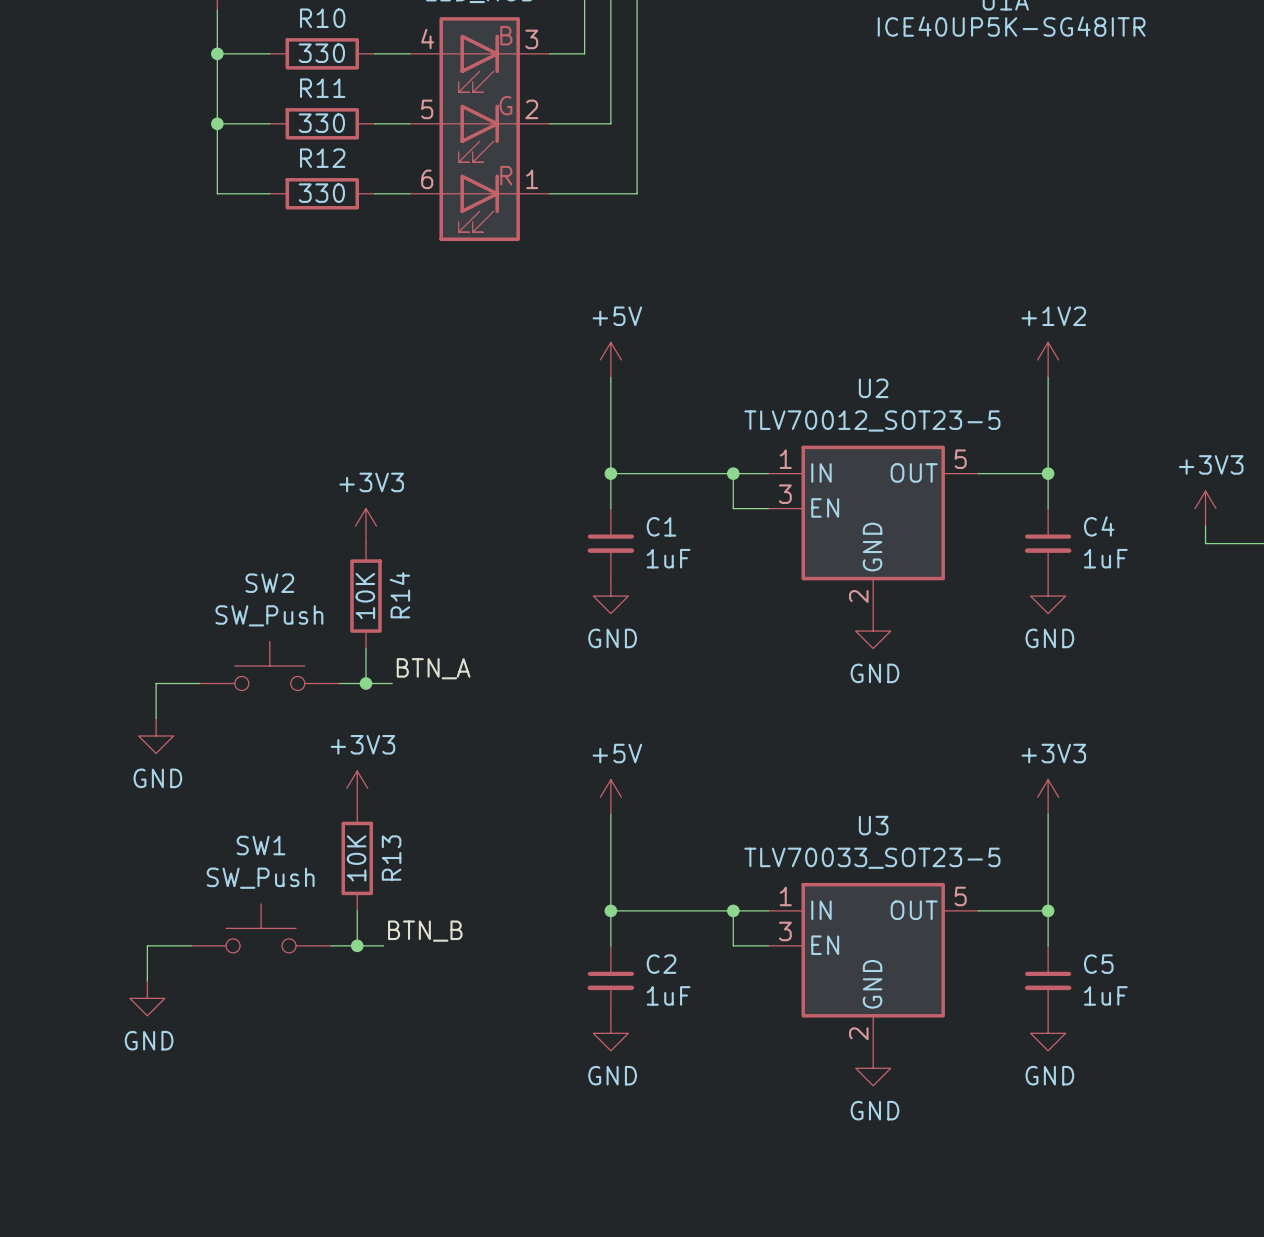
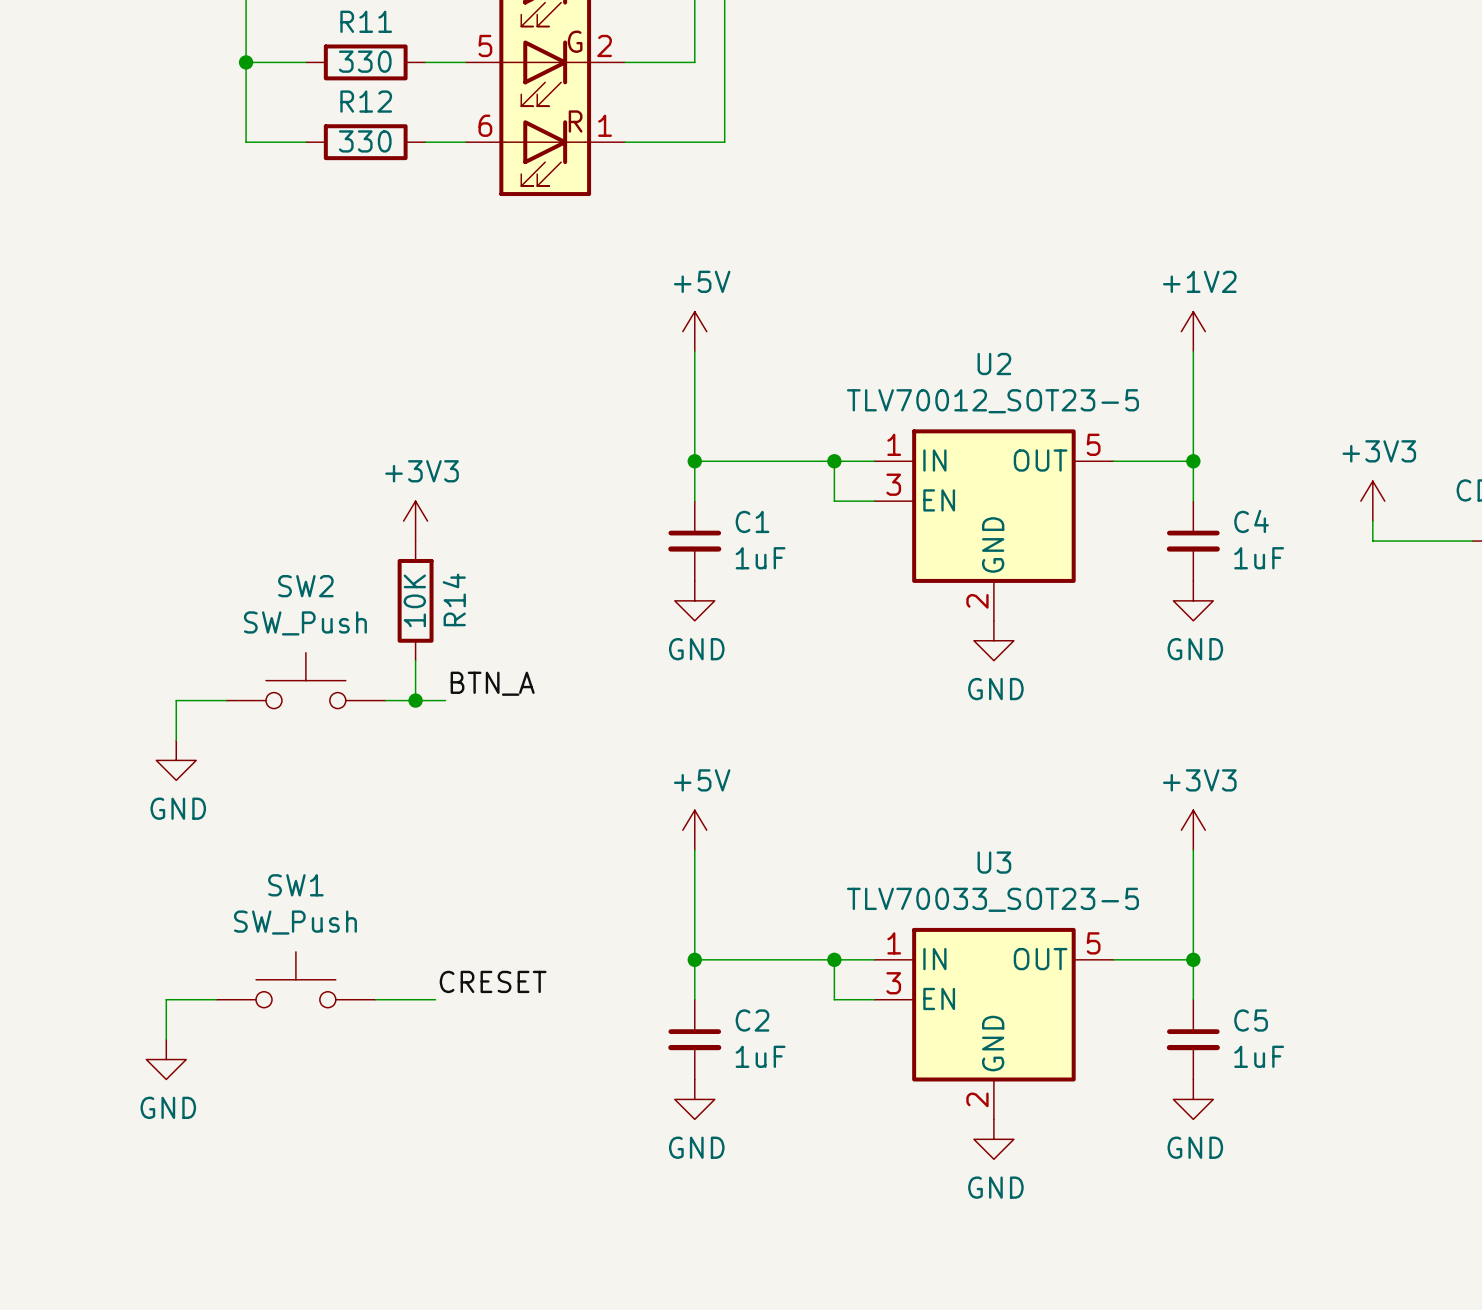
power symbol: +3V3 (357, 788) -> none
R13: 10K (357, 858) -> none
wire: (357, 910) (357, 945) -> none
label: BTN_B (425, 931) -> CRESET (493, 981)
junction: (357, 945) -> none

